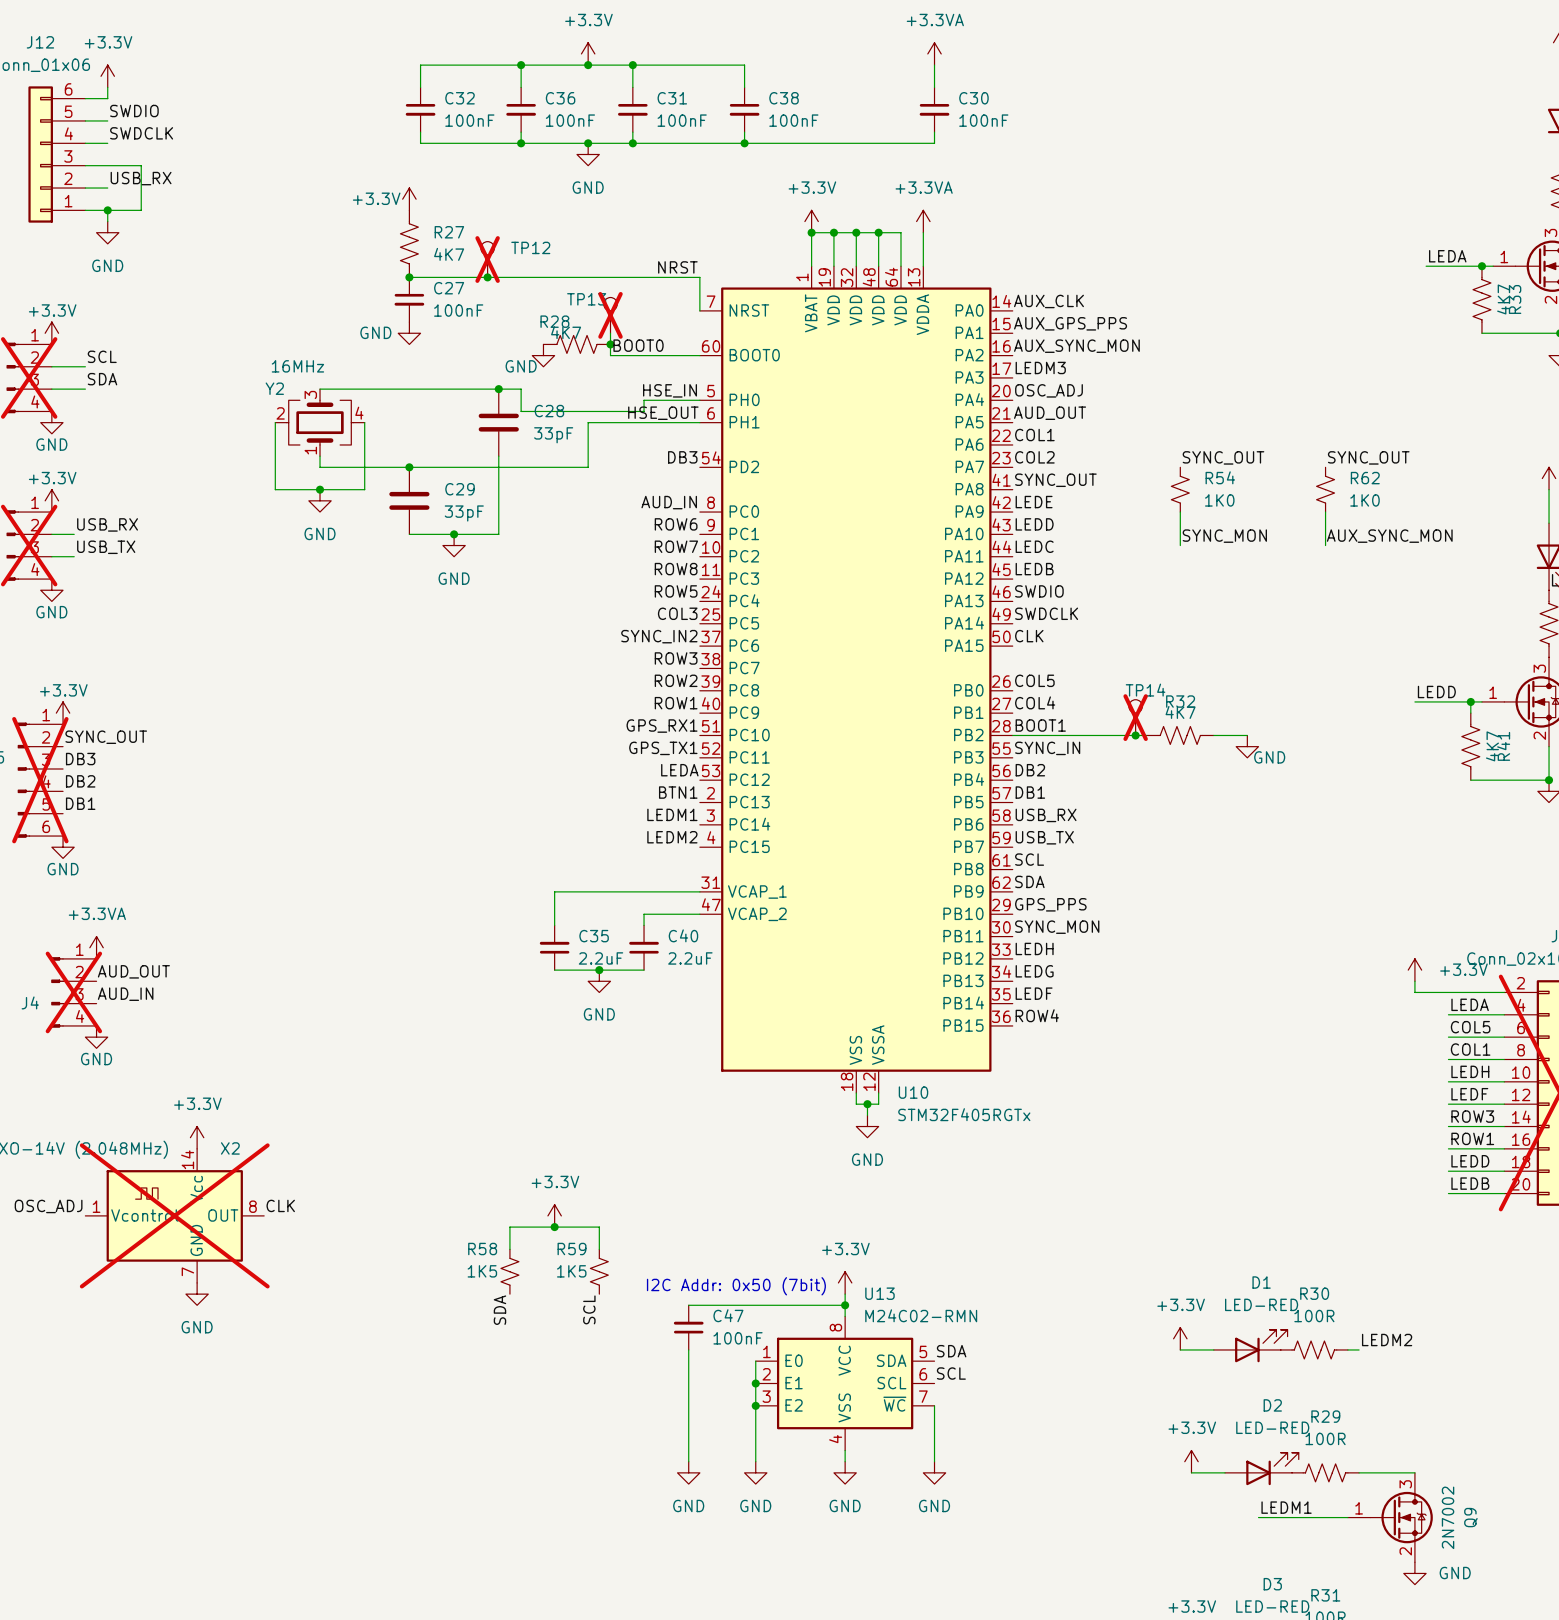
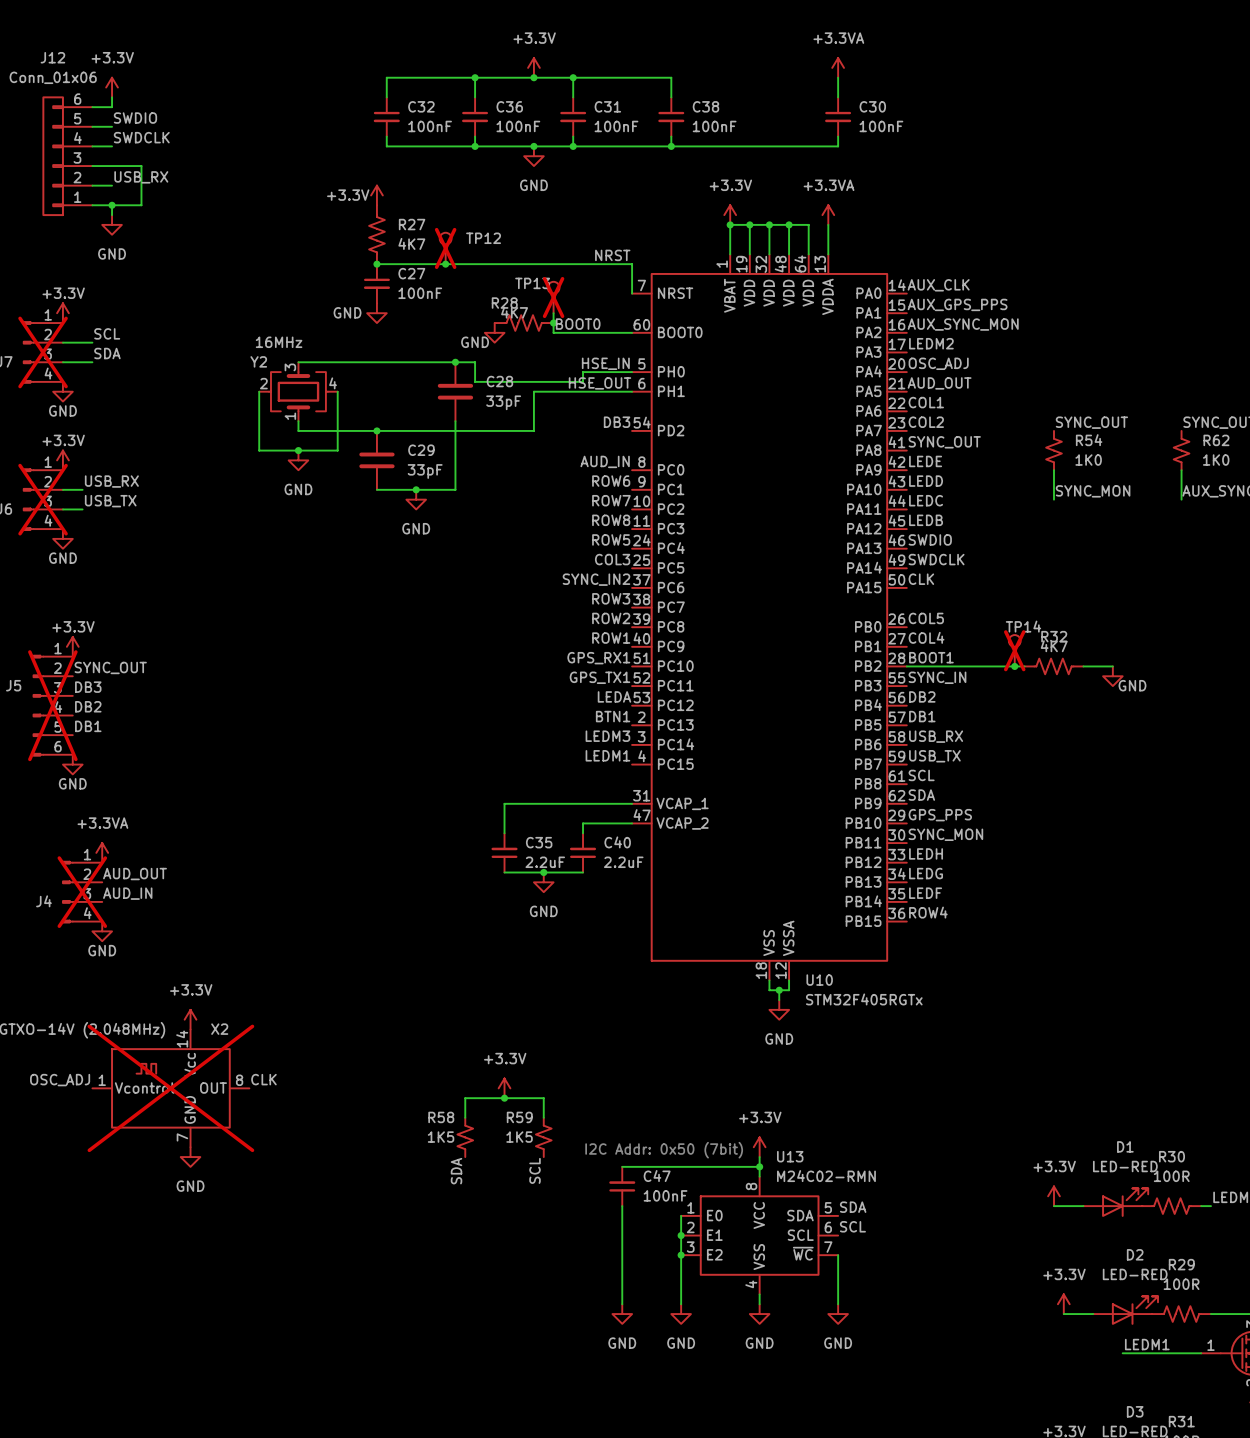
label: LEDM3 (1040, 367) -> LEDM2 (931, 343)
label: LEDM1 (672, 814) -> LEDM3 (607, 736)
label: LEDM2 (672, 837) -> LEDM1 (607, 755)

